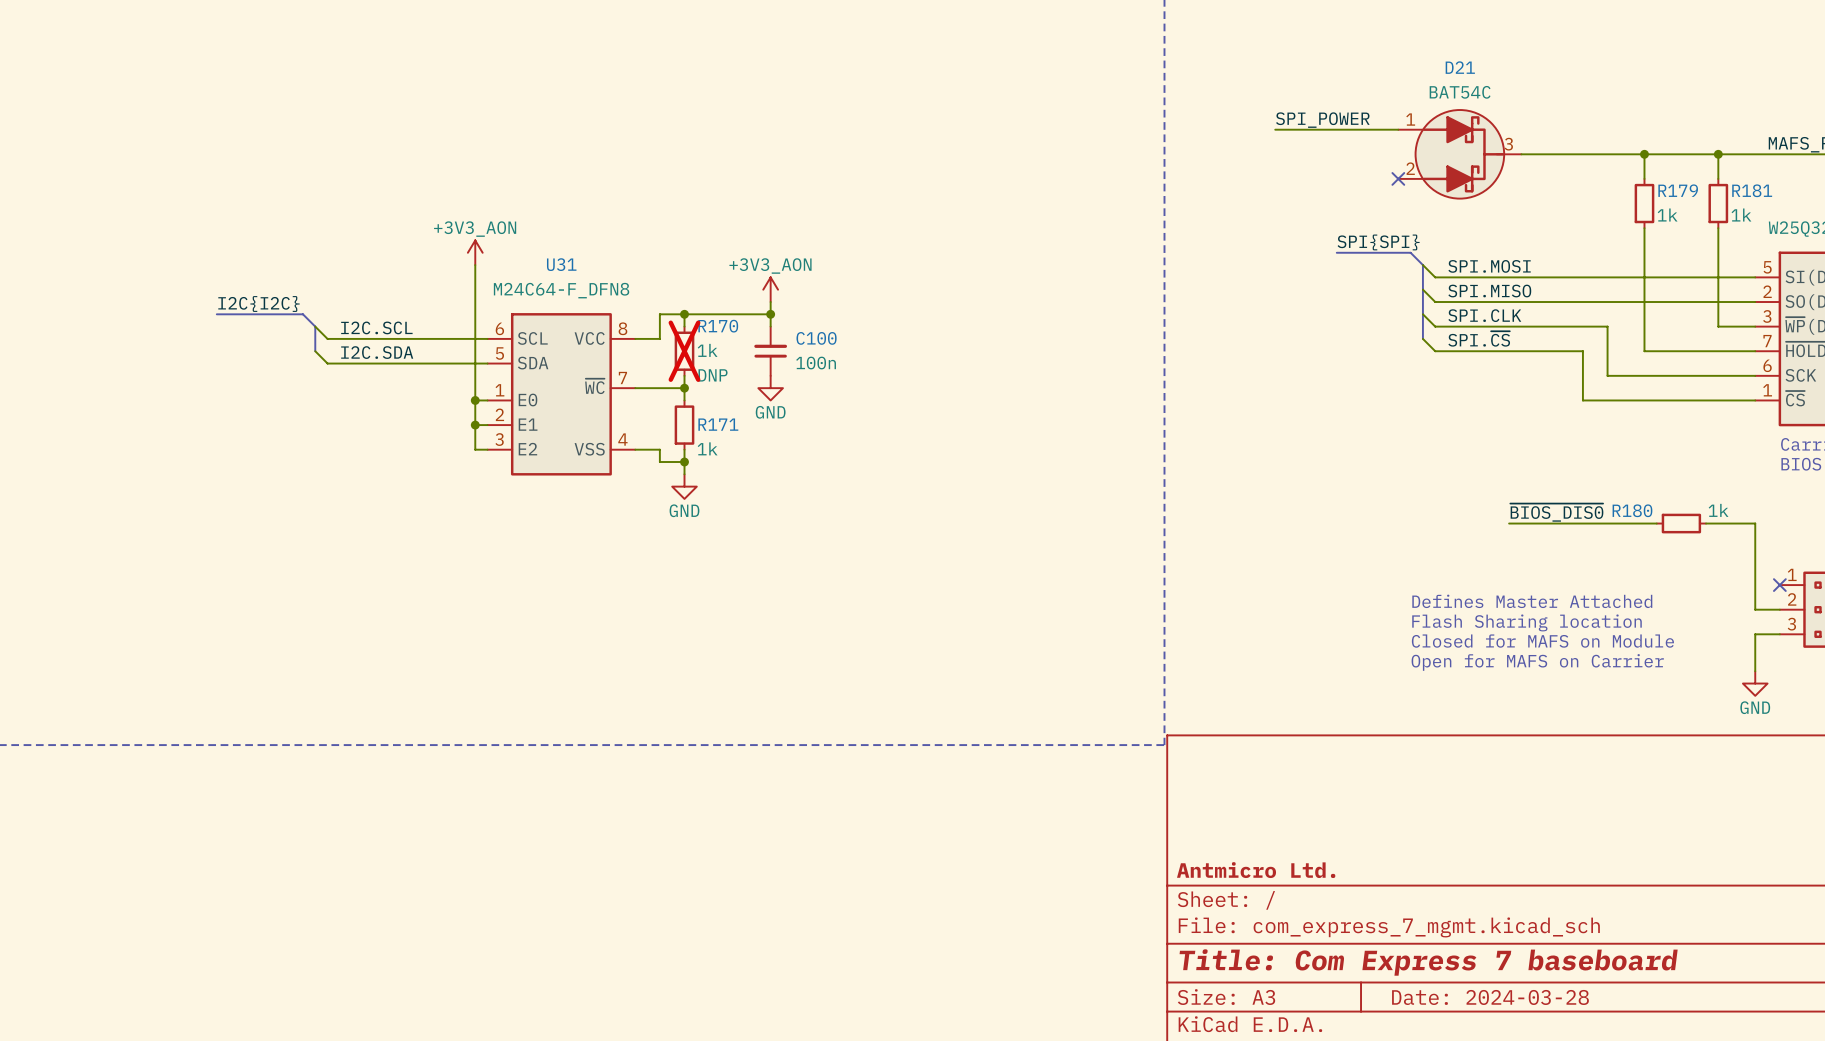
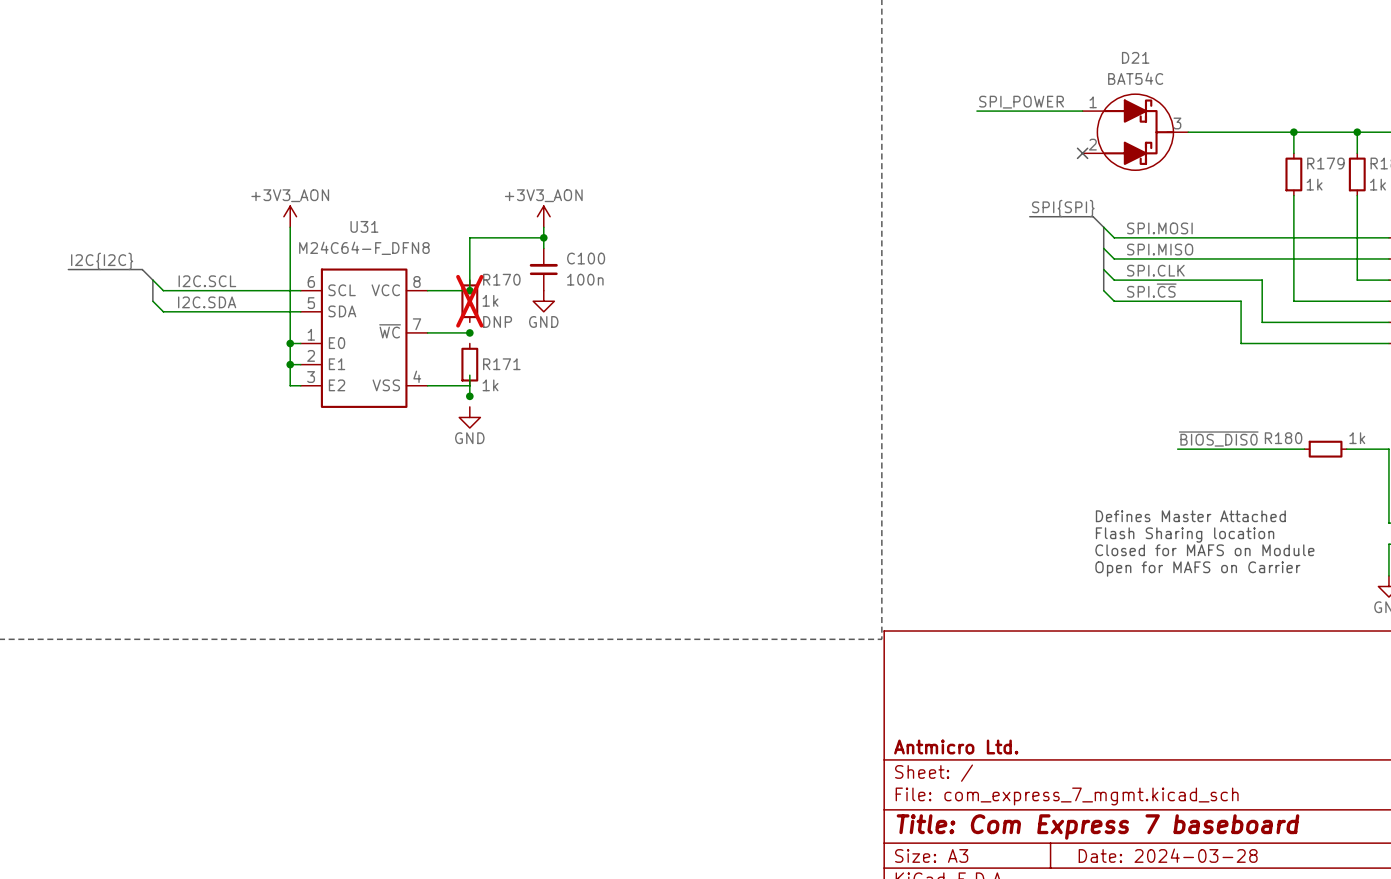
wire: none -> (543, 237) (469, 237) (469, 269)
power symbol position: +3V3_AON (770, 289) -> +3V3_AON (543, 216)
junction position: (684, 314) -> (469, 290)
wire: (770, 314) (659, 314) (659, 338) -> (469, 280) (469, 290) (448, 290)
junction position: (770, 314) -> (543, 237)
C100 position: (770, 351) -> (543, 269)
wire: (684, 375) (684, 400) -> none
power symbol position: GND (770, 388) -> GND (543, 301)
wire: (659, 449) (659, 462) (684, 462) (684, 474) -> (448, 385) (469, 385) (469, 375)

